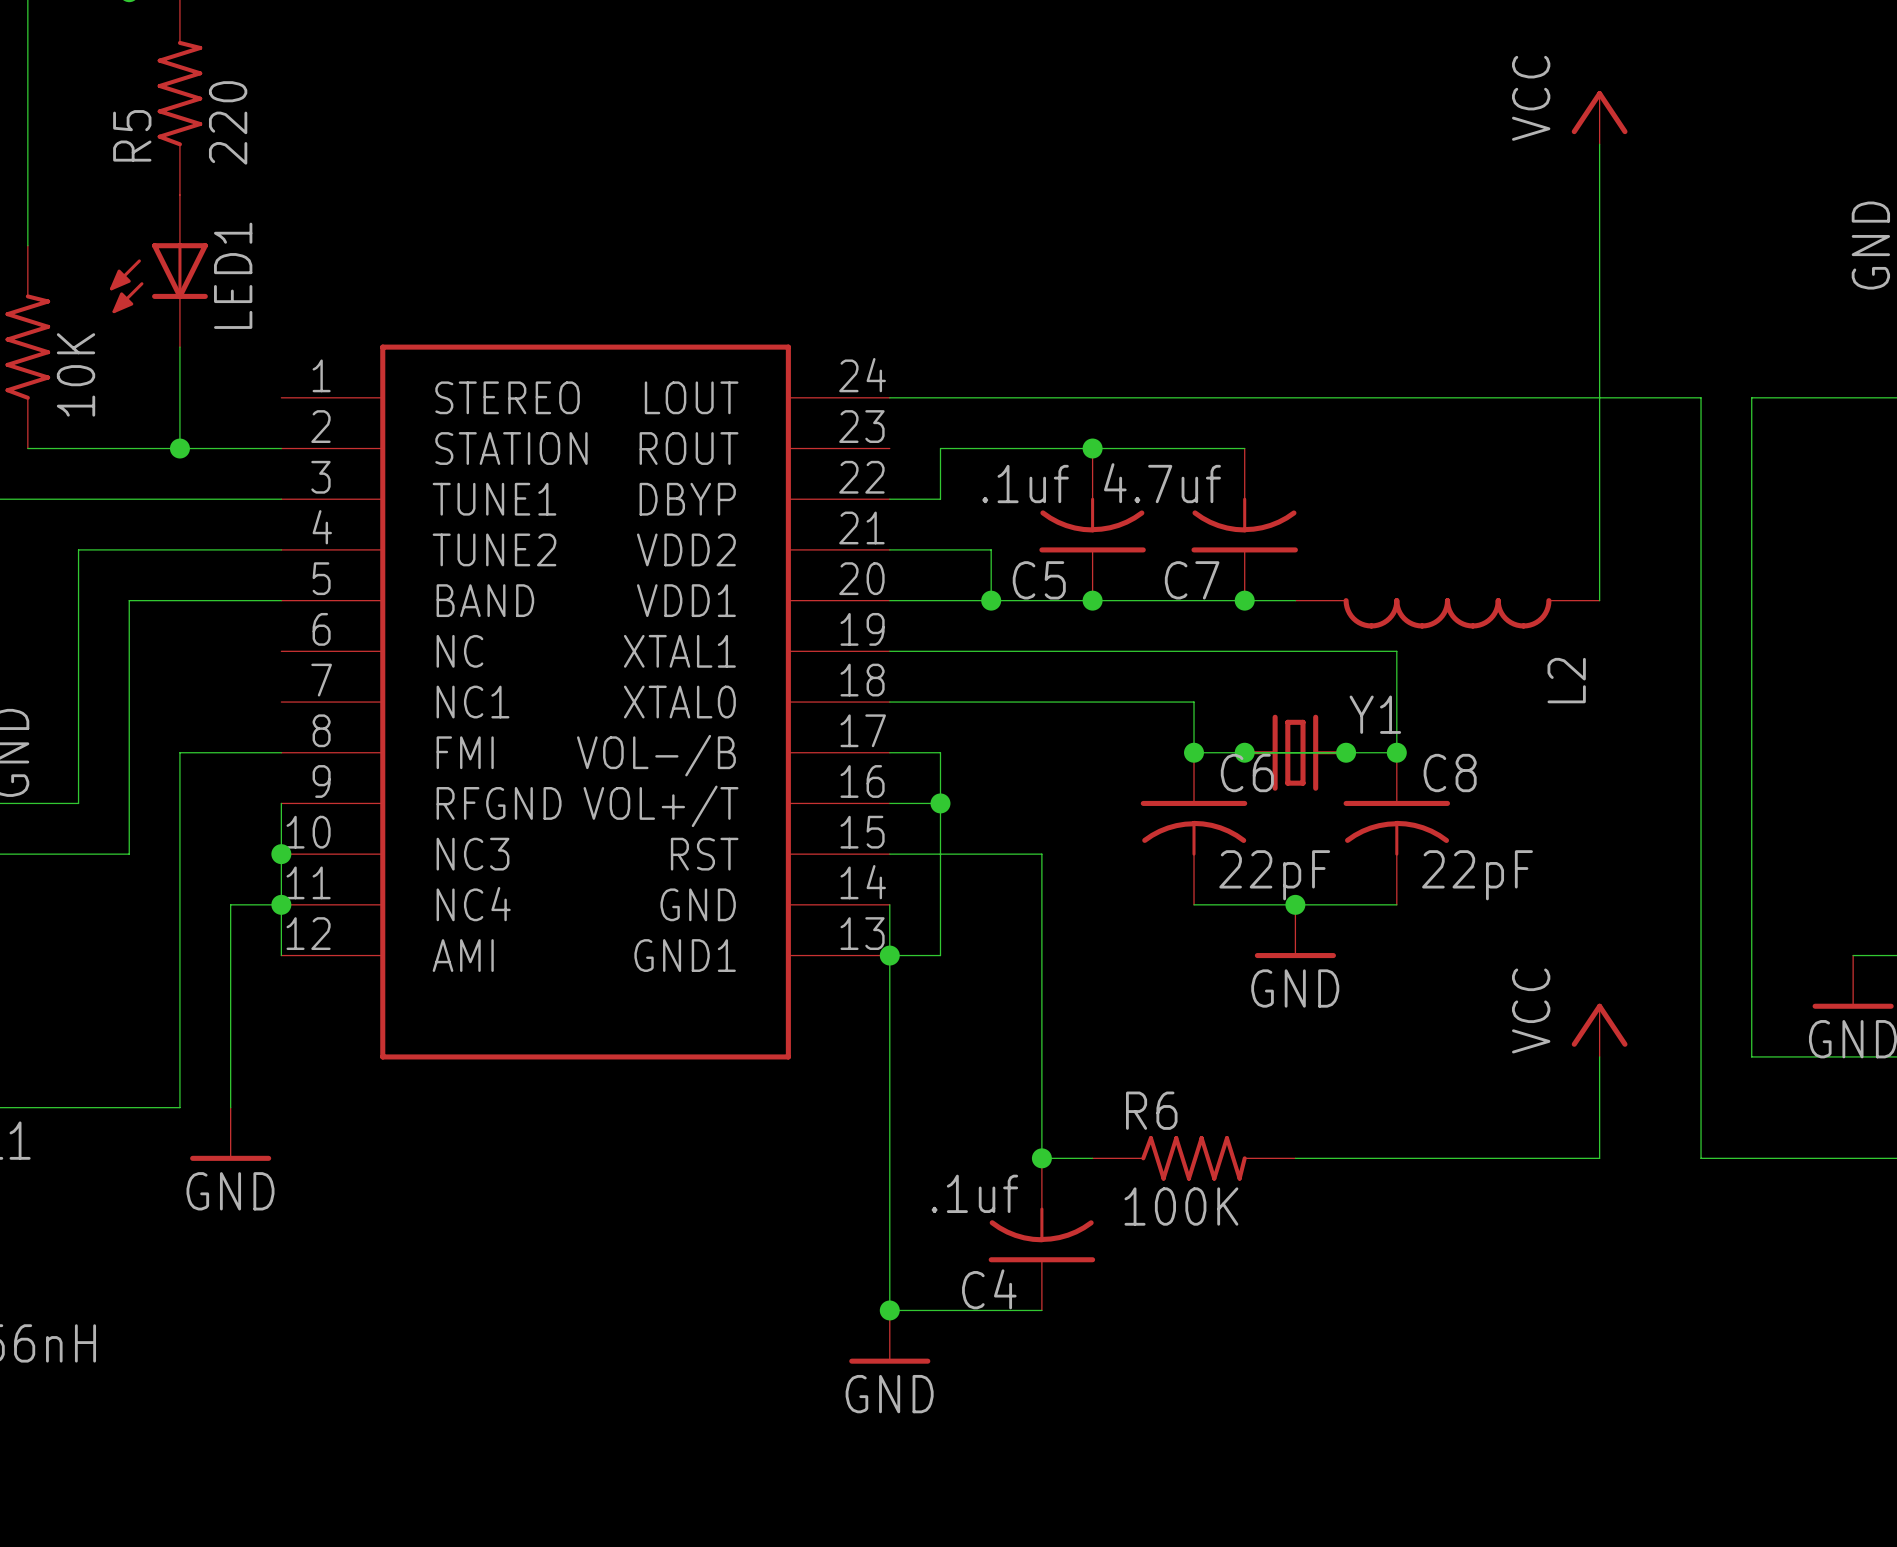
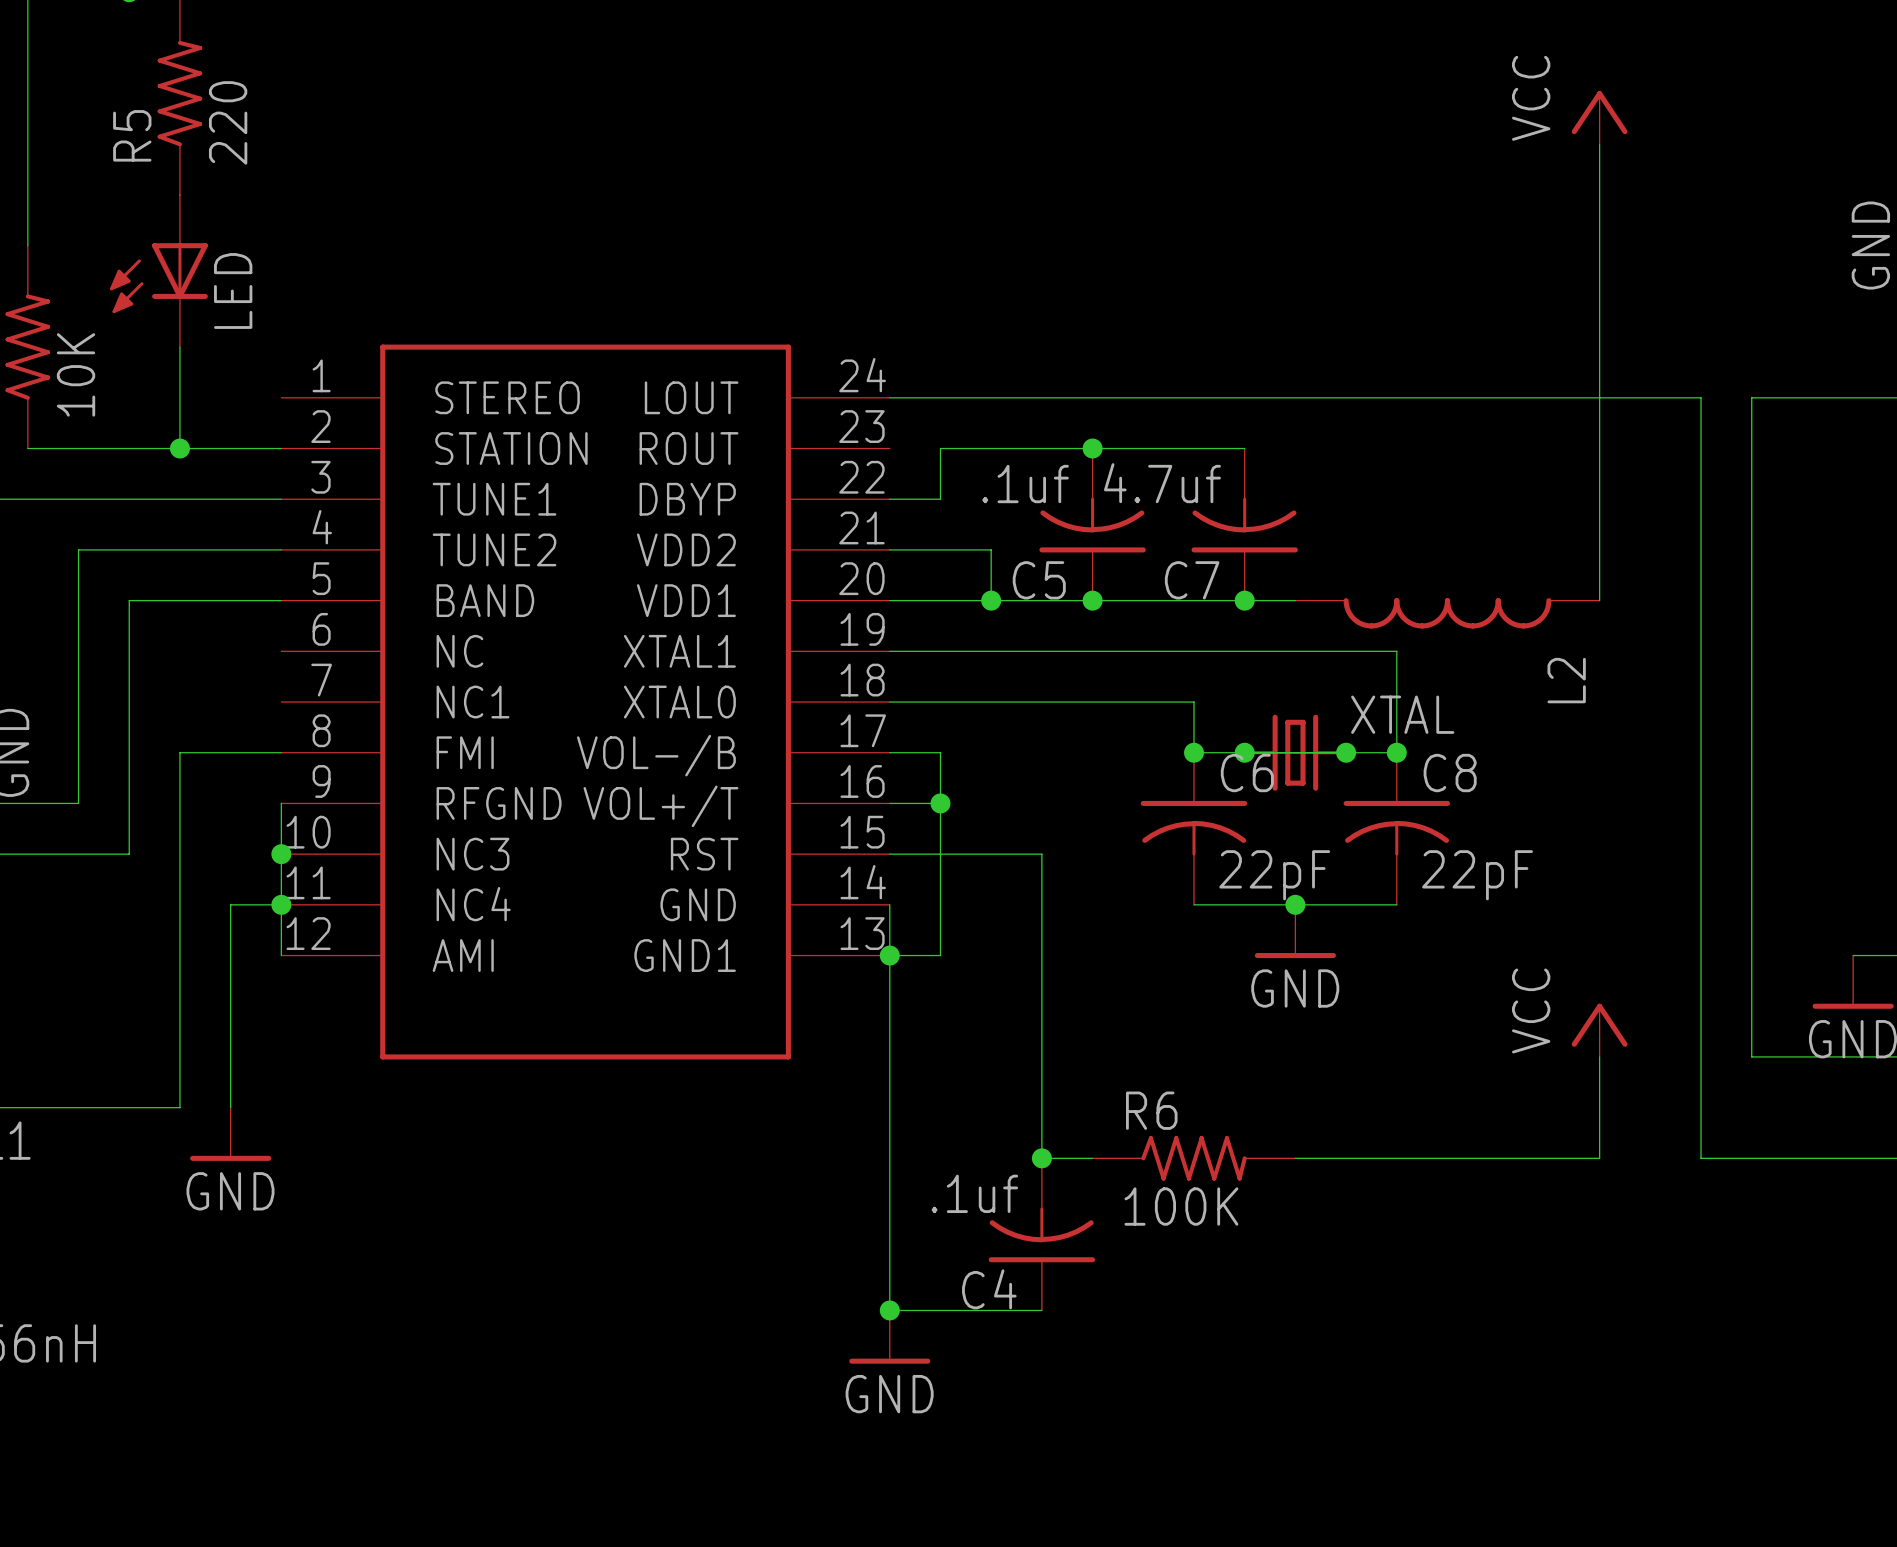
LED1 name: LED1 (233, 275) -> LED (233, 290)
Y1 name: Y1 (1375, 714) -> XTAL (1402, 714)

